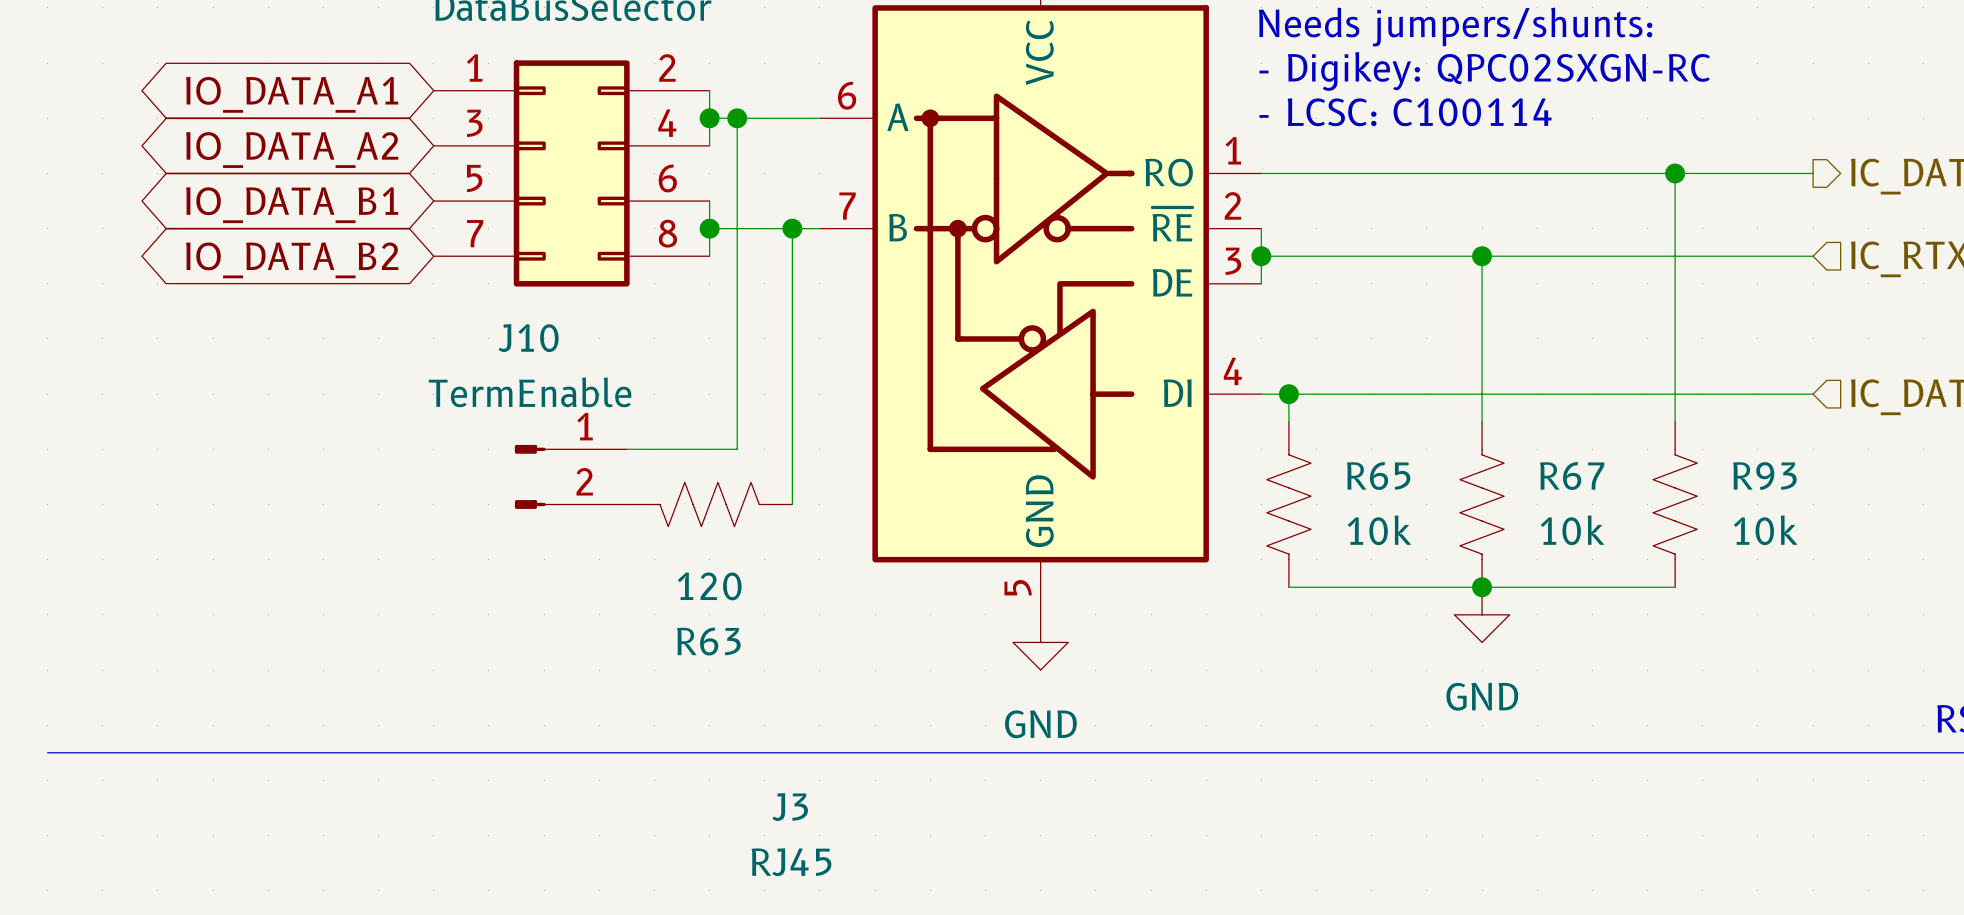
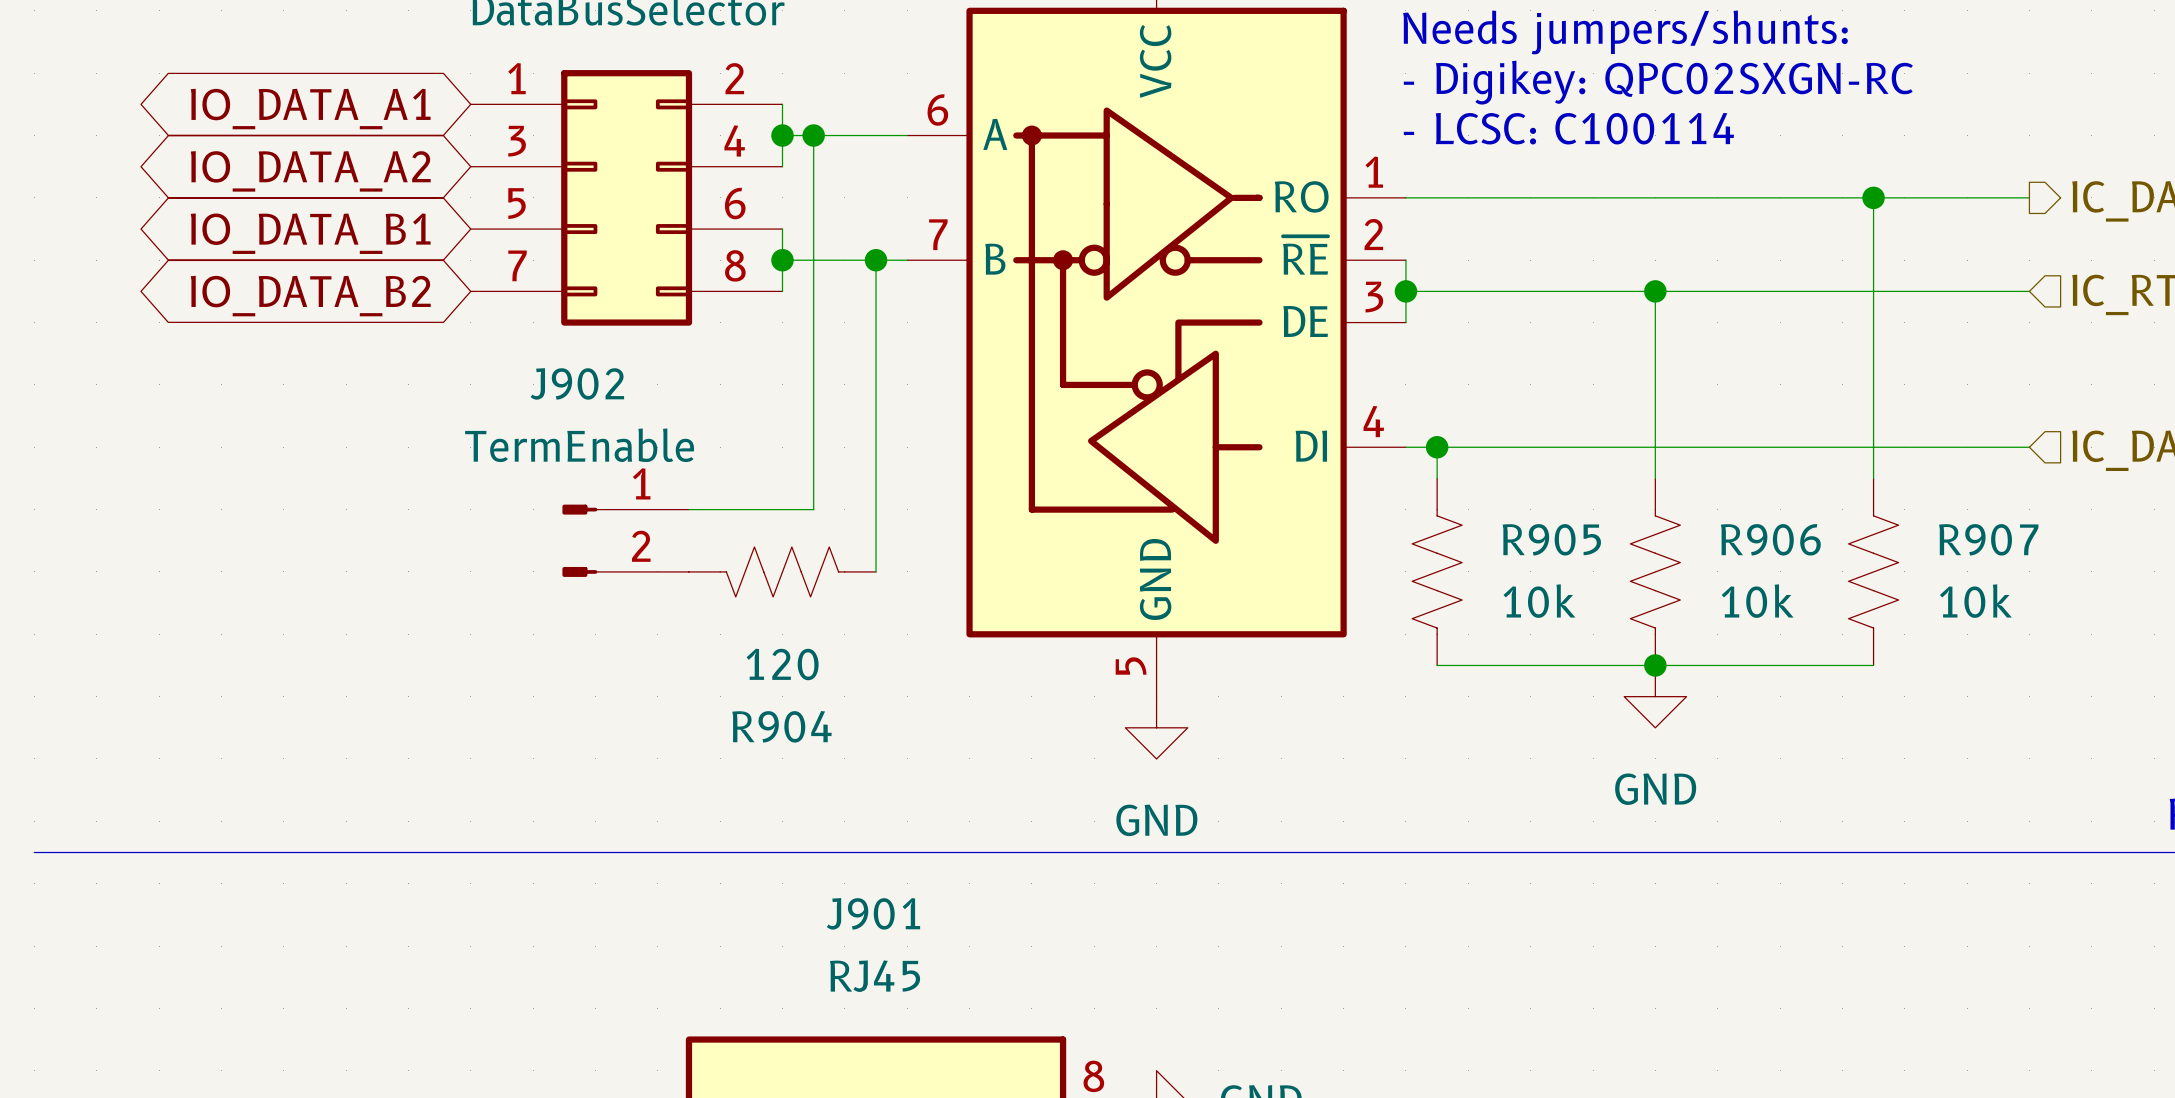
J10 name: J10 (528, 338) -> J902 (577, 383)
R65 name: R65 (1378, 476) -> R905 (1551, 539)
R67 name: R67 (1572, 476) -> R906 (1770, 539)
R93 name: R93 (1764, 476) -> R907 (1988, 539)
R63 name: R63 (708, 641) -> R904 (782, 726)
J3 name: J3 (790, 807) -> J901 (873, 913)

